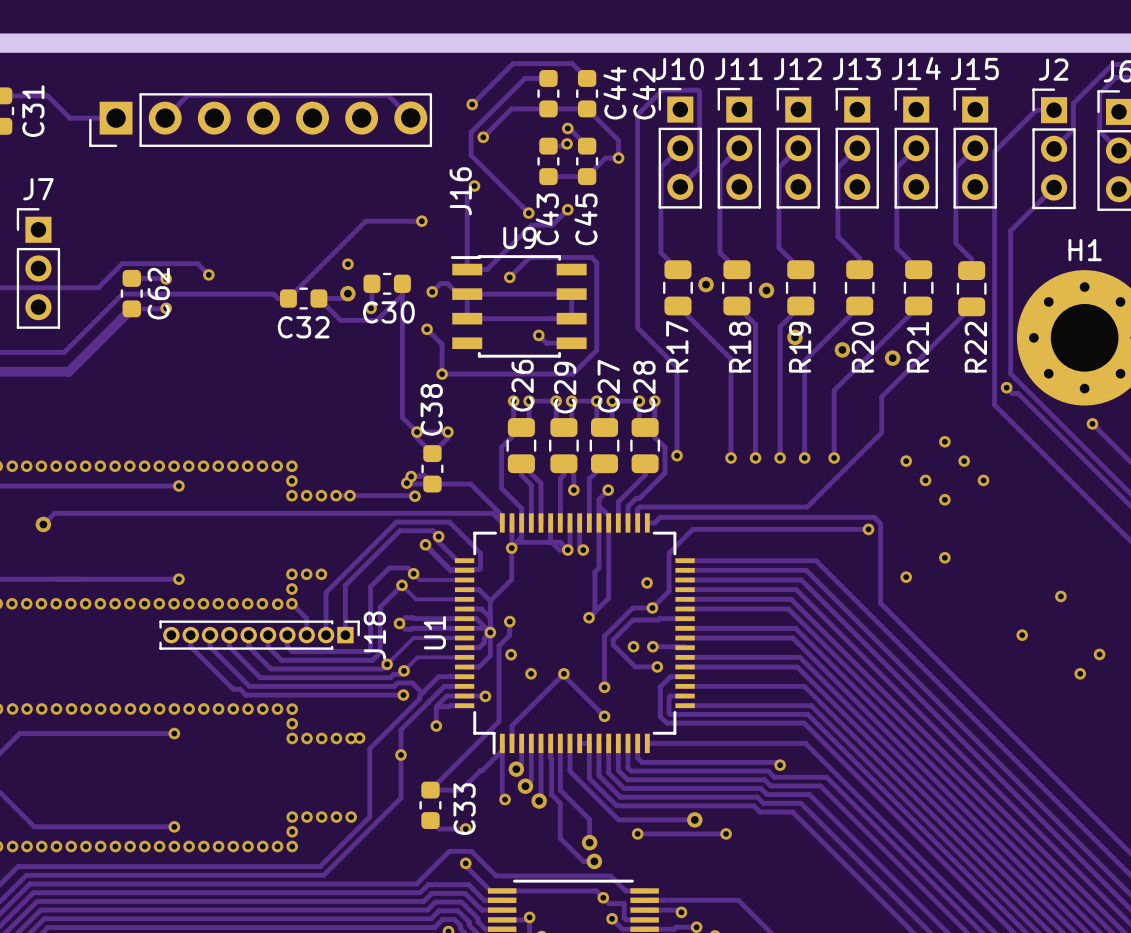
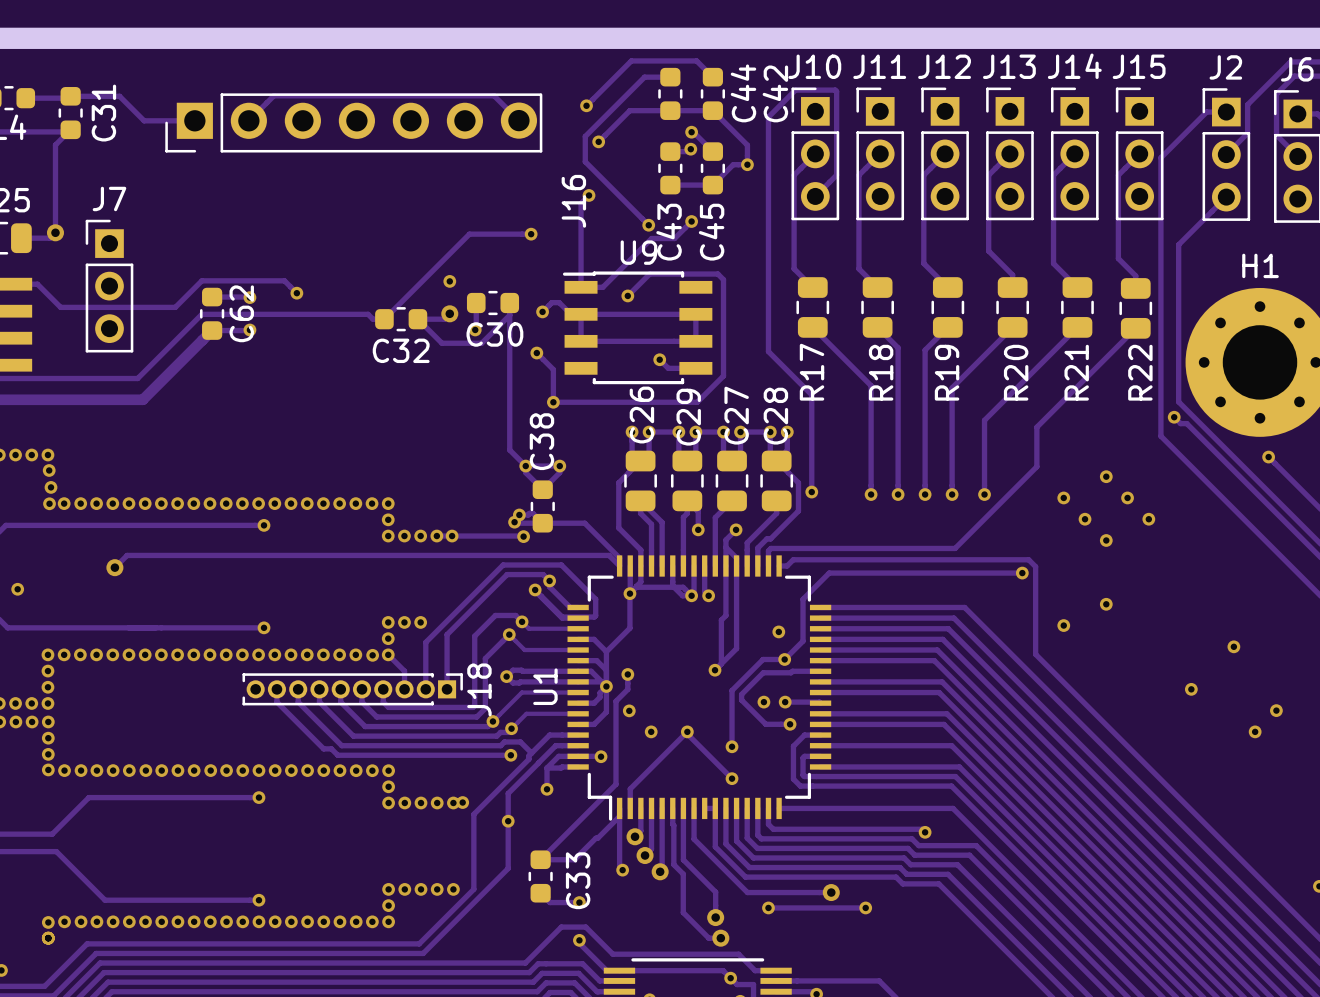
via: (706, 284) -> none
via: (766, 290) -> none
via: (795, 337) -> none
via: (842, 349) -> none
via: (892, 358) -> none

